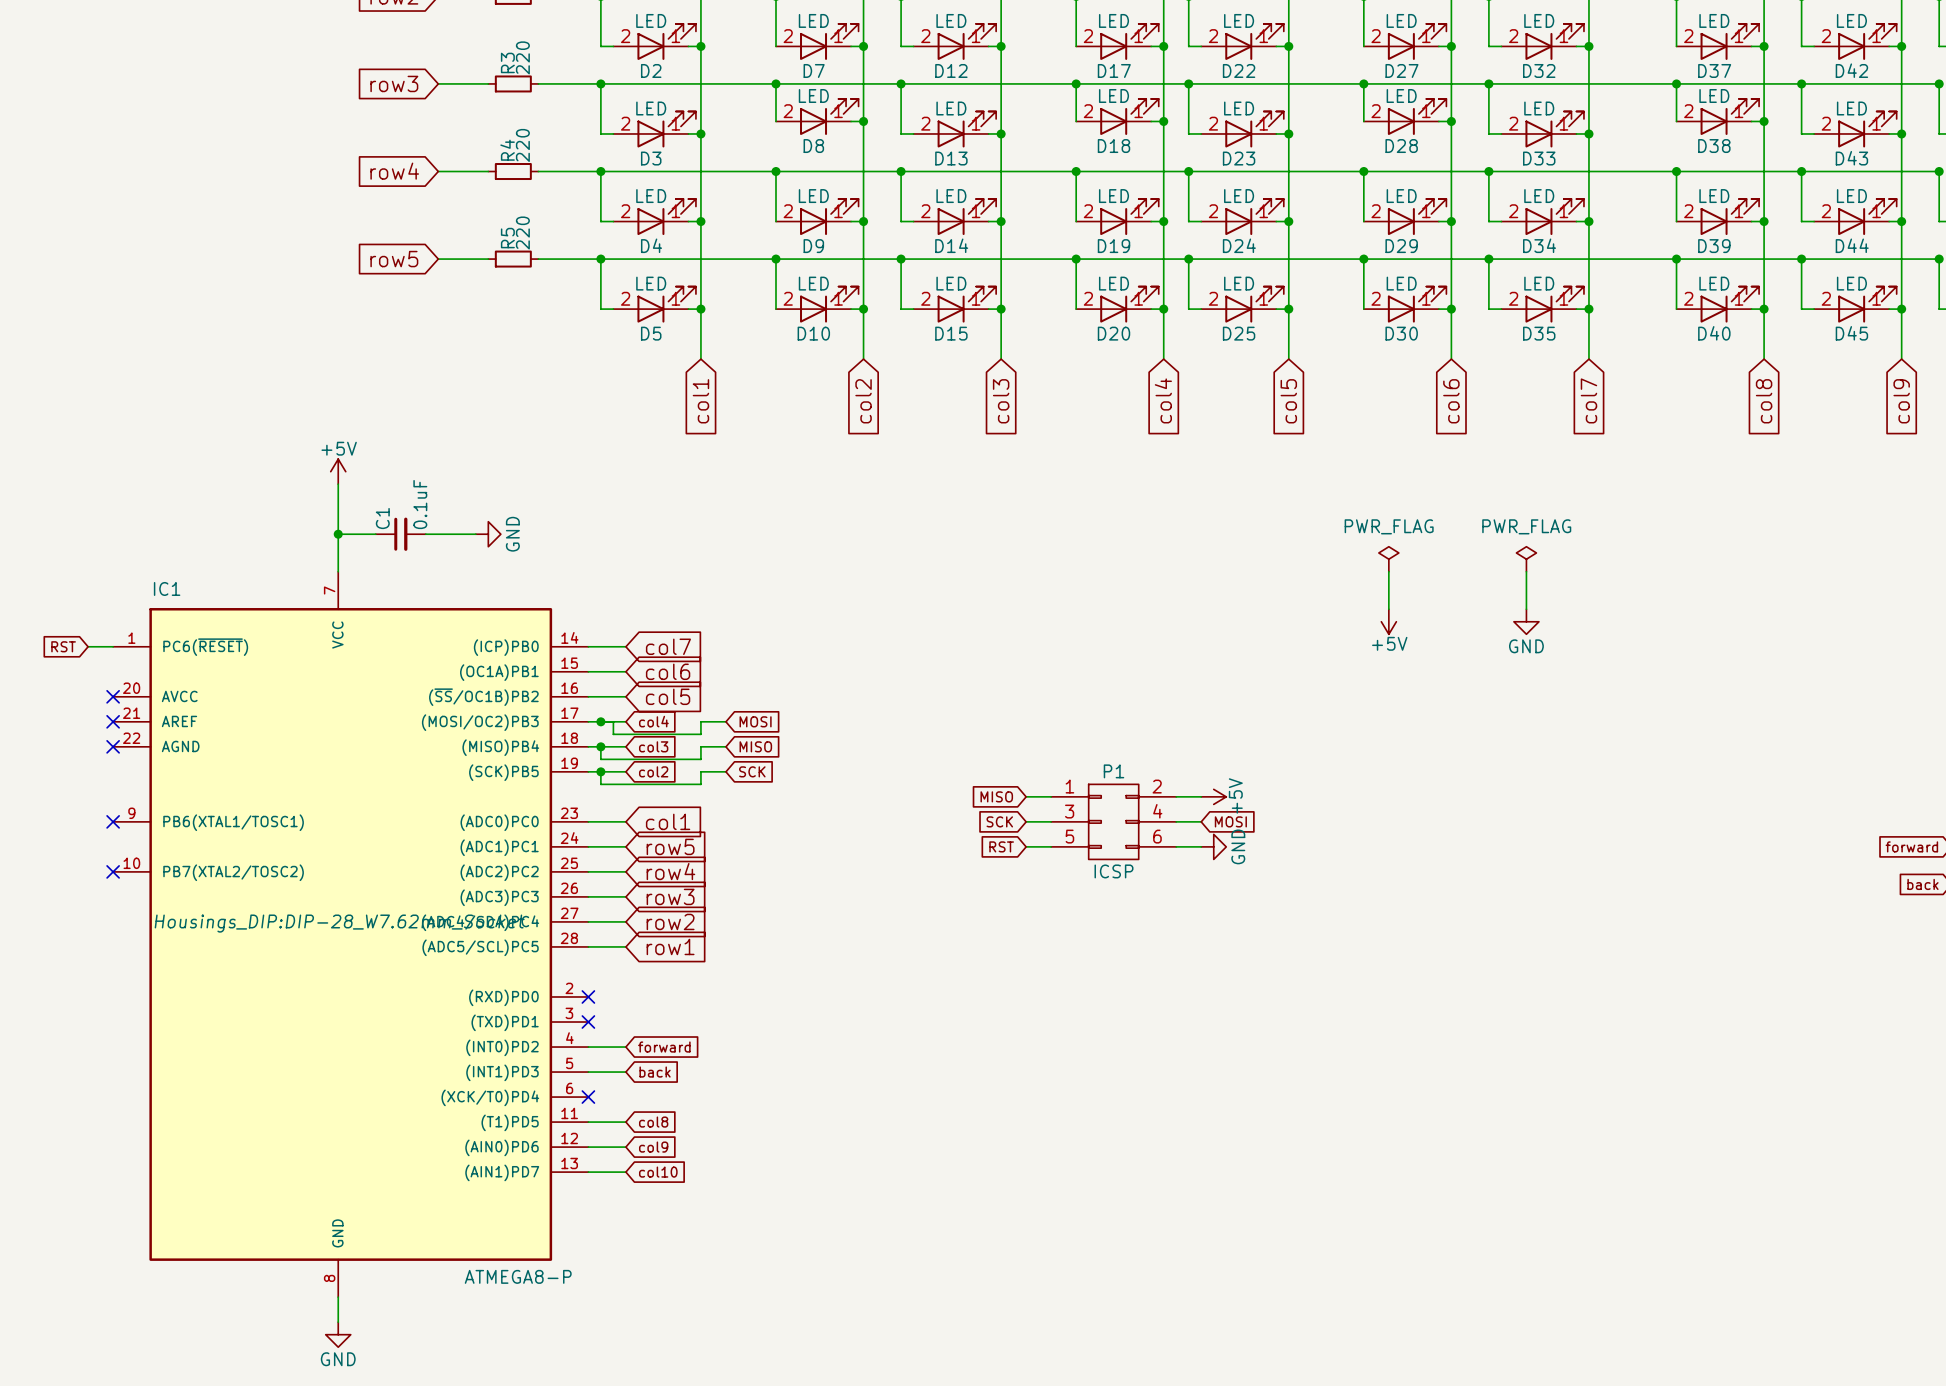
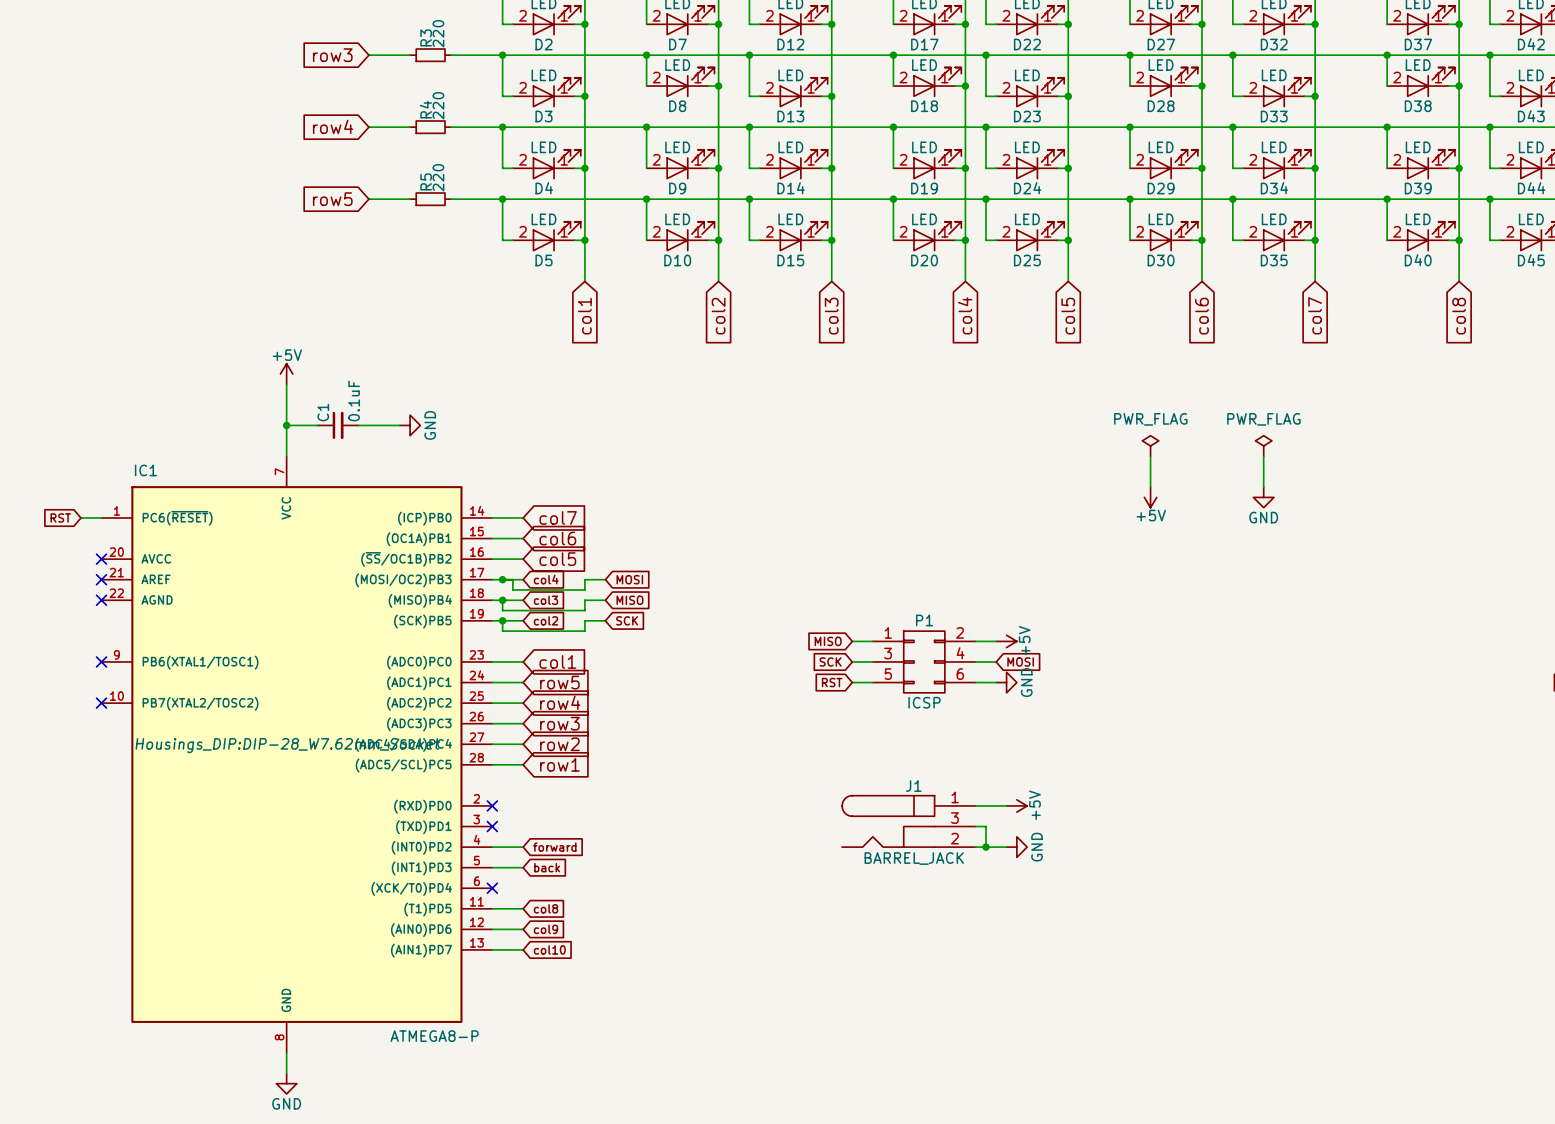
wire: none -> (975, 805) (1006, 805)
power symbol: none -> +5V (1016, 805)
J1: none -> BARREL_JACK (908, 821)
wire: none -> (975, 826) (986, 826) (986, 847)
wire: none -> (975, 847) (1006, 847)
junction: none -> (986, 847)
power symbol: none -> GND (1016, 847)

